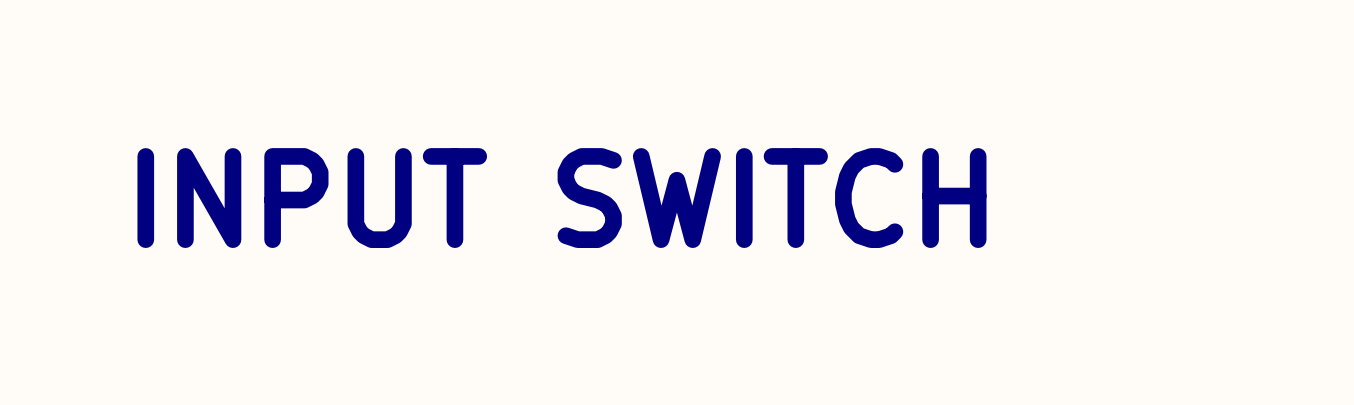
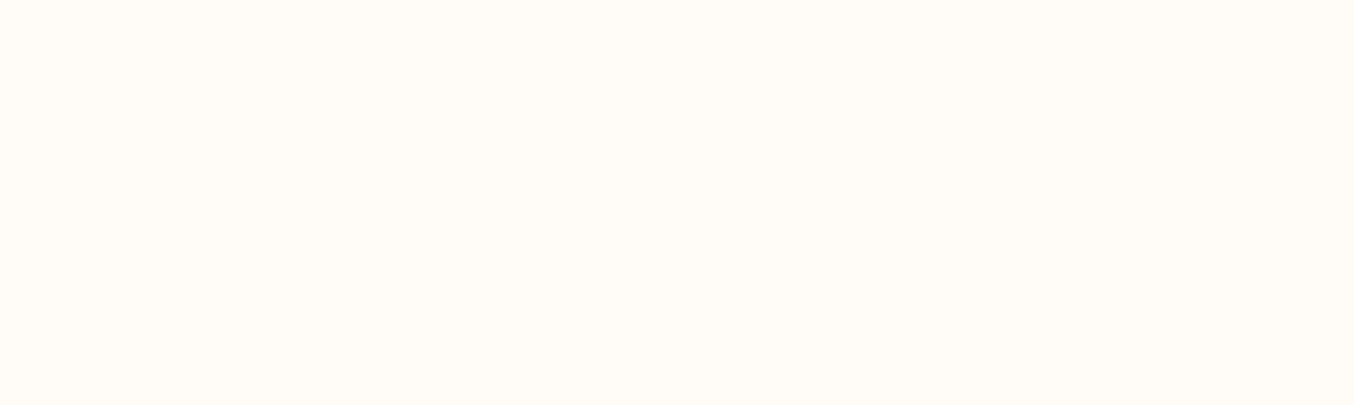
text: INPUT SWITCH (561, 198) -> none

